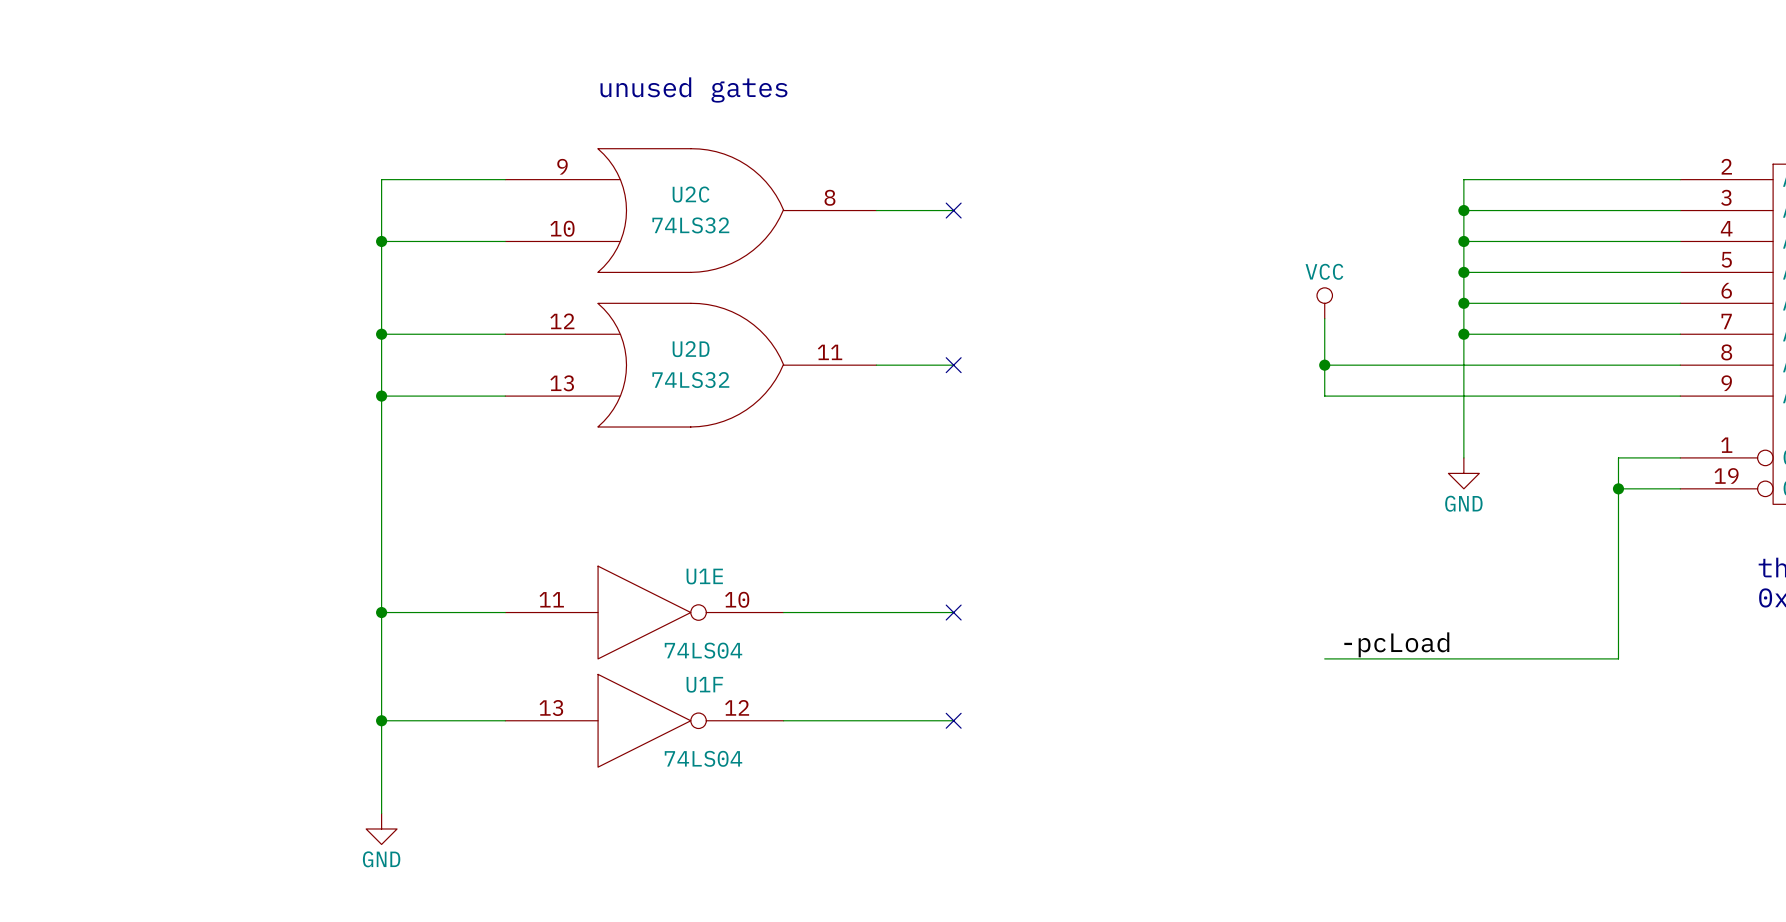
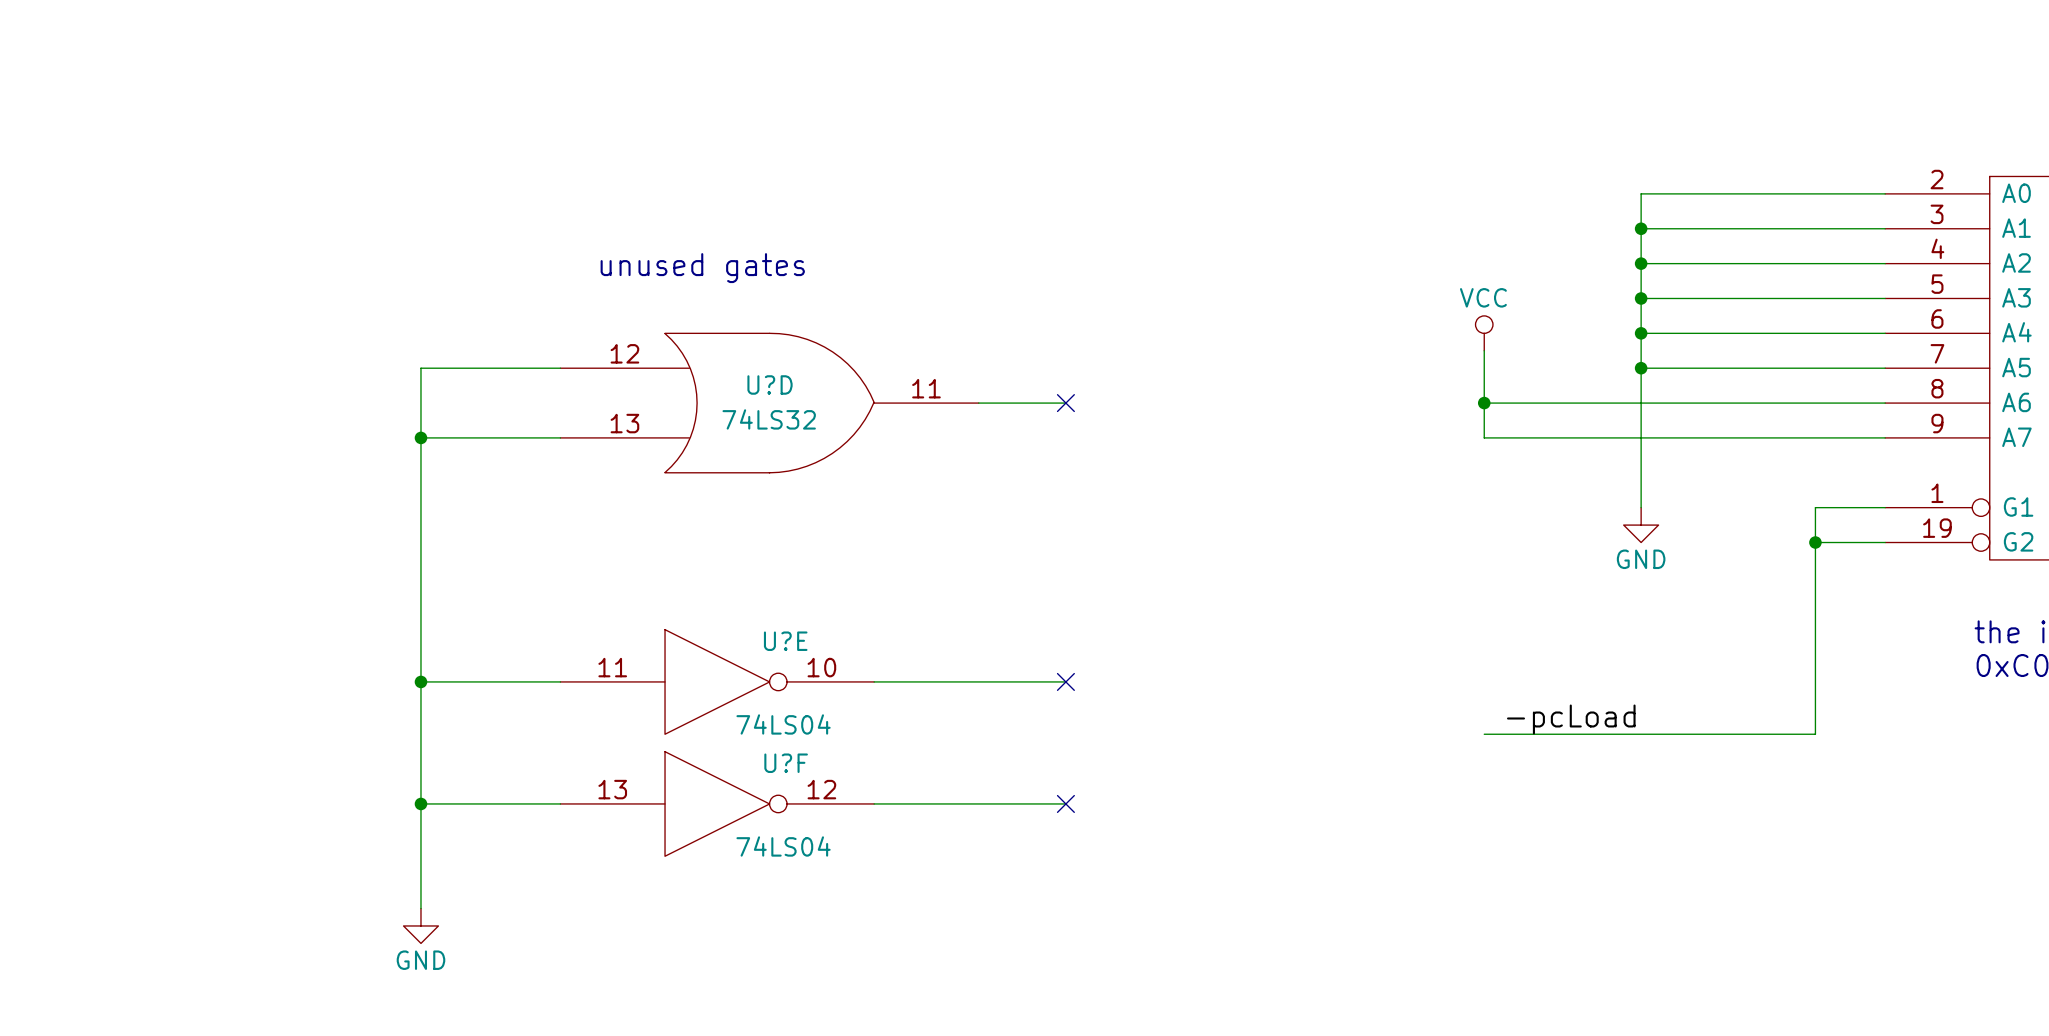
text position: unused gates (693, 89) -> unused gates (702, 268)
wire: (505, 179) (381, 179) (381, 334) -> none
U2C: 74LS32 (690, 210) -> none
wire: (876, 210) (953, 210) -> none
no-connect mark: (953, 210) -> none
wire: (381, 241) (505, 241) -> none
junction: (381, 241) -> none
junction: (381, 334) -> none
U2D name: U2D (691, 349) -> U?D (770, 384)
U1E name: U1E (704, 576) -> U?E (785, 641)
U1F name: U1F (704, 684) -> U?F (786, 763)

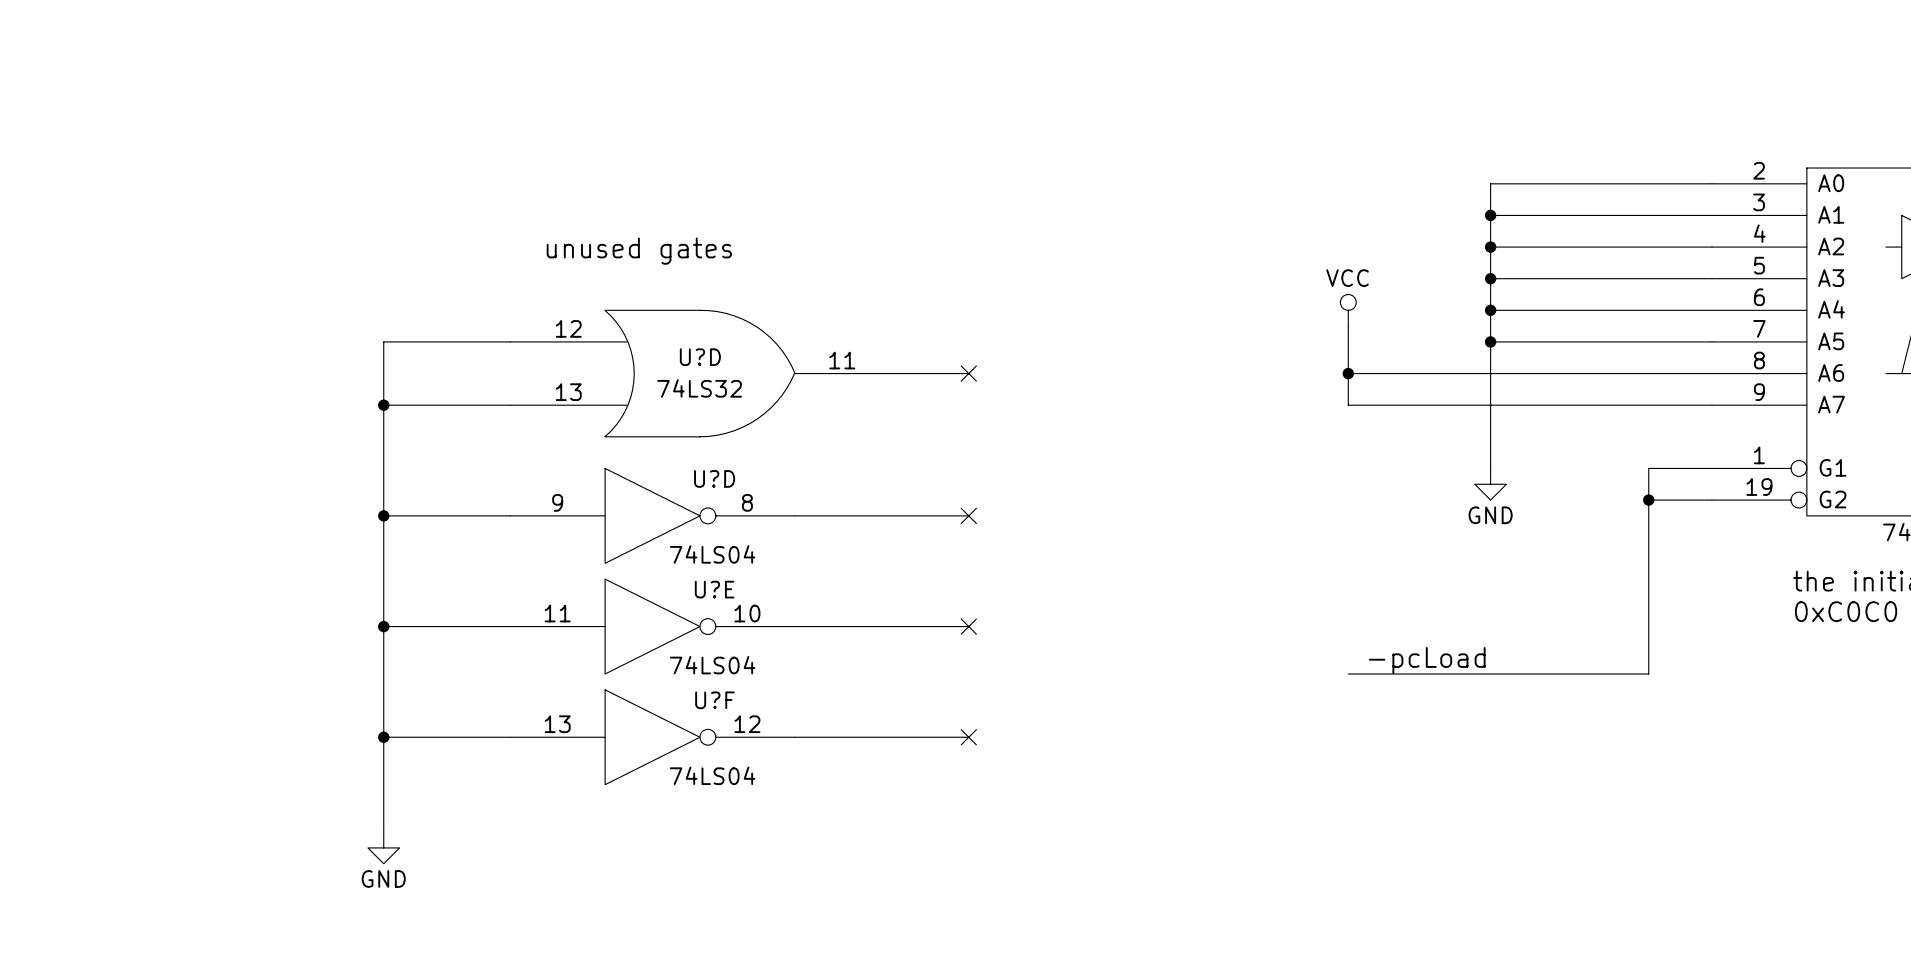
wire: none -> (383, 515) (510, 515)
junction: none -> (383, 515)
U?D: none -> 74LS04 (652, 515)
wire: none -> (794, 515) (968, 515)
no-connect mark: none -> (968, 515)

